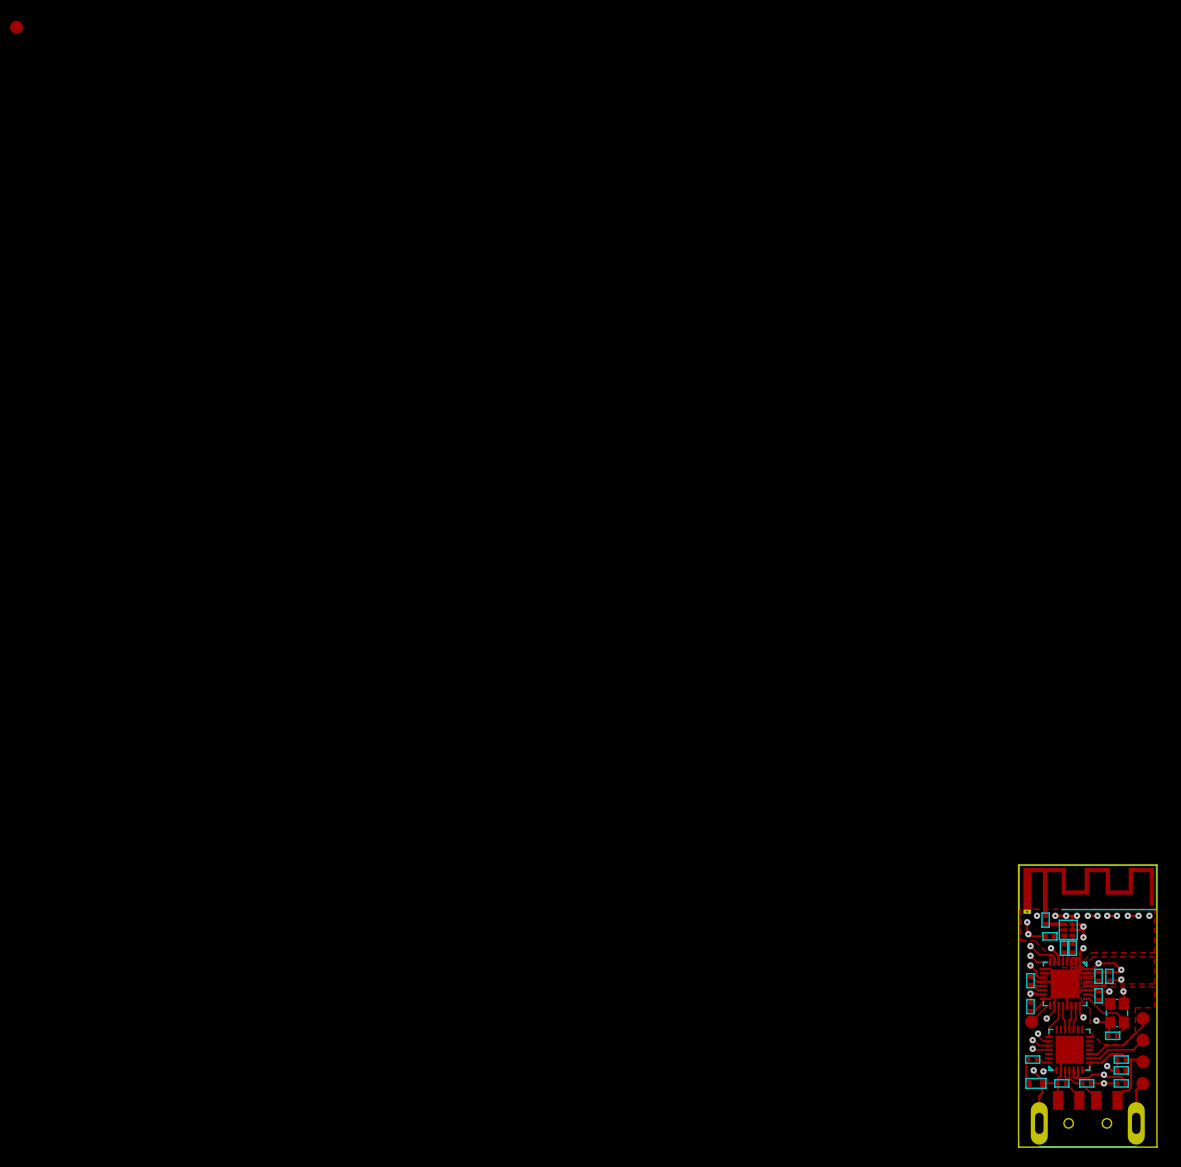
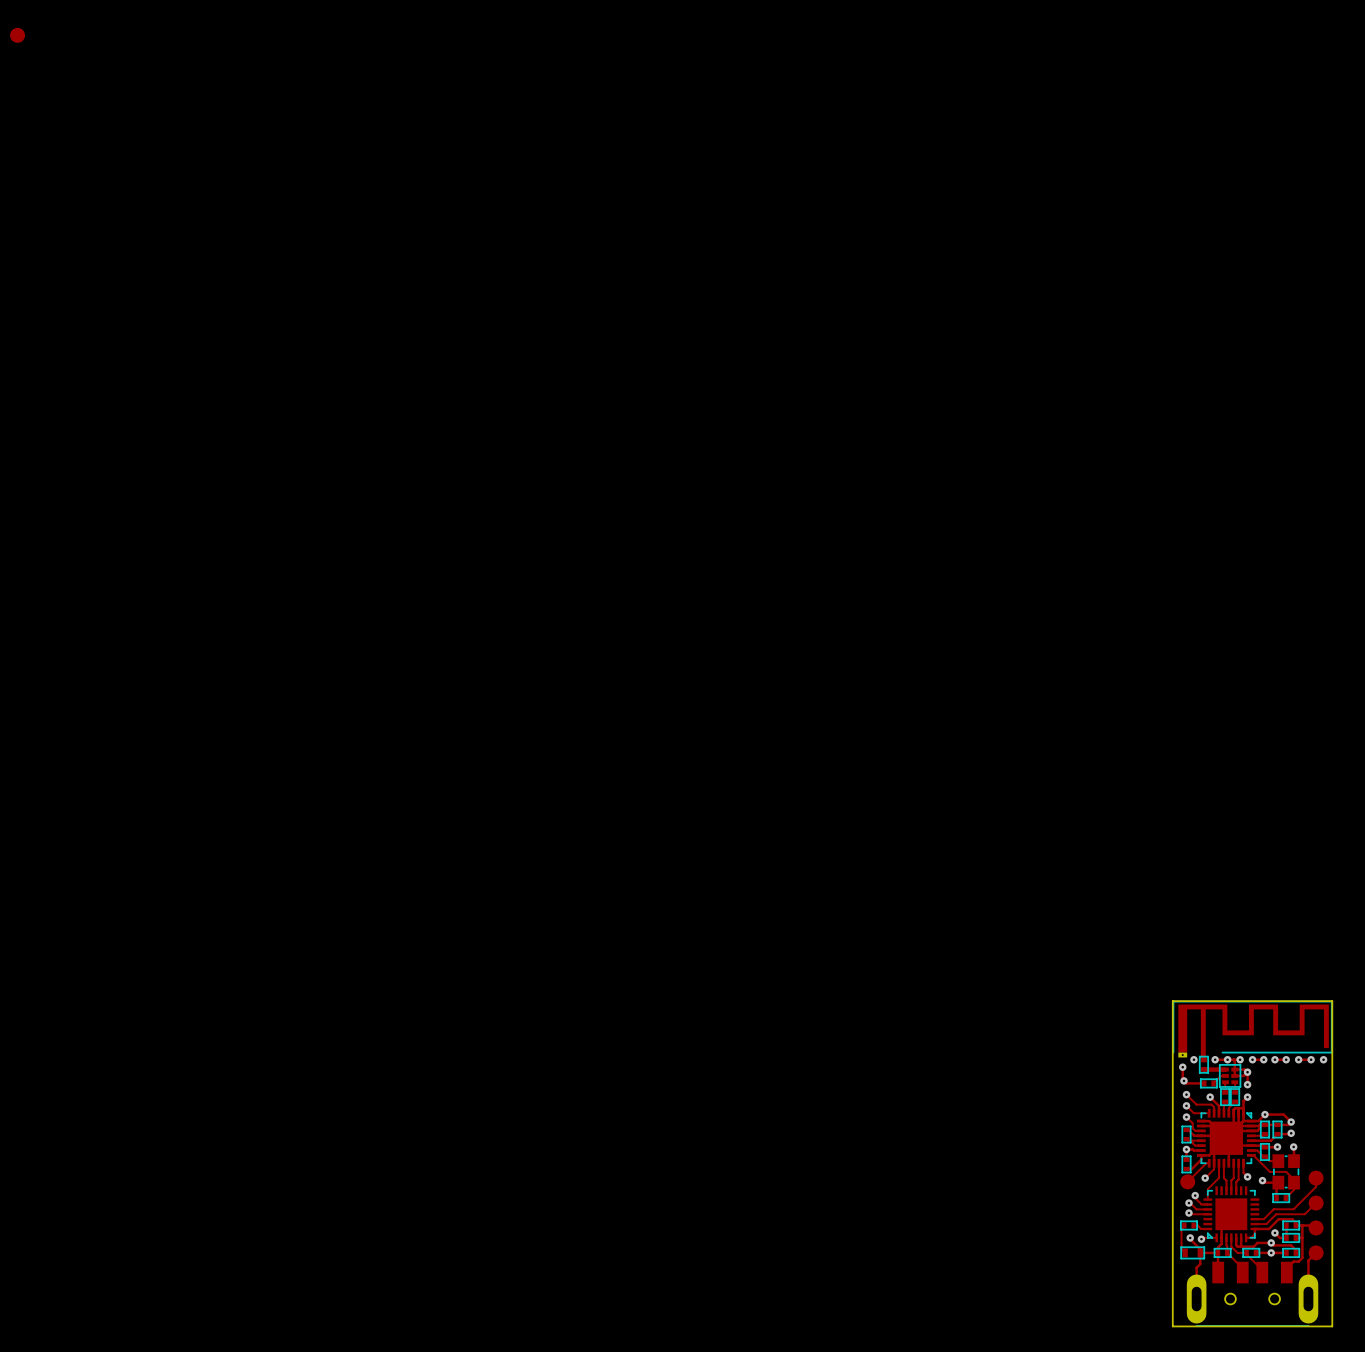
zone outline: (1020, 909) (1154, 909) (1154, 952) (1092, 952) (1076, 967) (1061, 967) (1034, 940) (1020, 940) (1020, 909) -> none
zone outline: (1093, 956) (1154, 956) (1154, 983) (1081, 983) (1081, 968) (1093, 956) -> none
zone outline: (1081, 987) (1081, 1000) (1089, 1008) (1089, 1031) (1102, 1044) (1123, 1044) (1135, 1032) (1135, 1007) (1154, 1007) (1154, 987) (1081, 987) -> none

